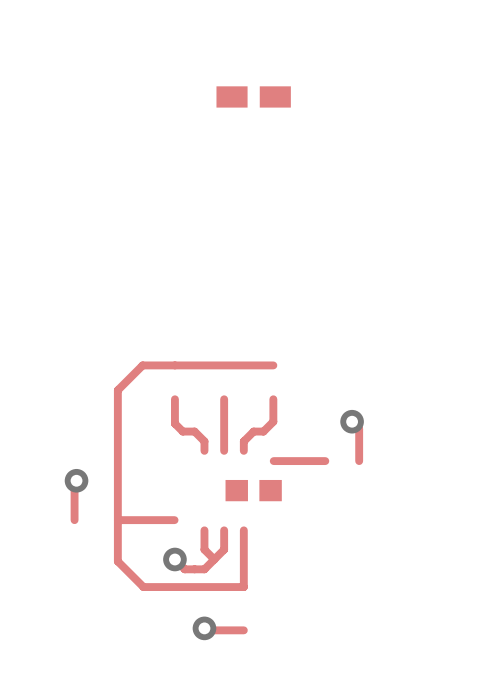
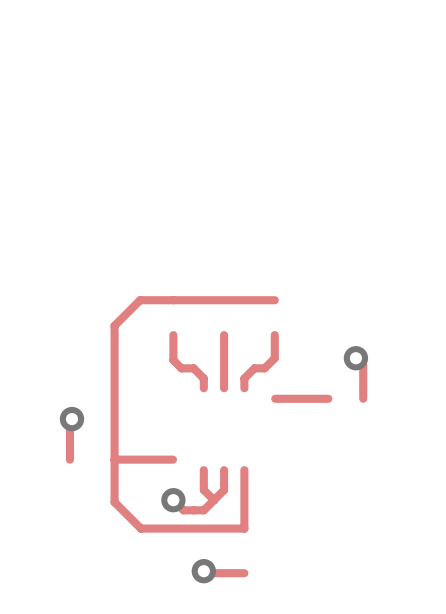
part: (253, 96) -> none
part: (253, 490) -> none

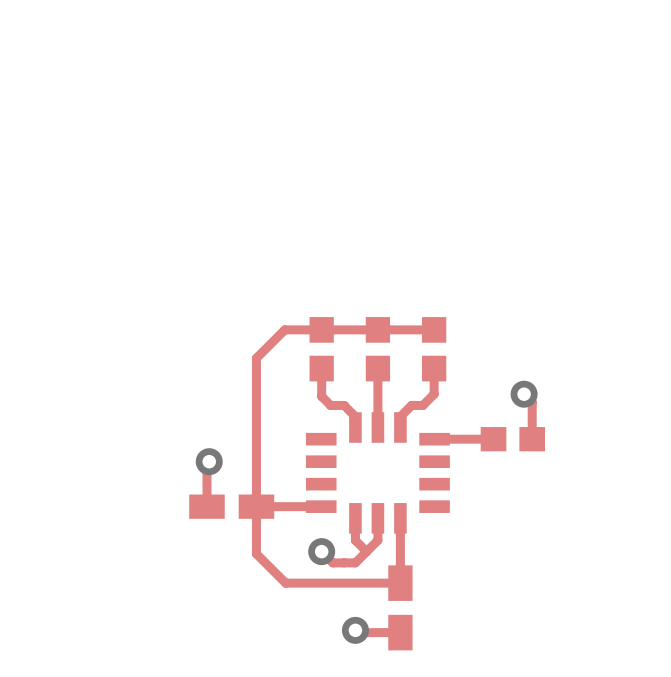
part: none -> (321, 349)
part: none -> (377, 349)
part: none -> (434, 349)
part: none -> (512, 439)
part: none -> (377, 472)
part: none -> (231, 506)
part: none -> (400, 607)

